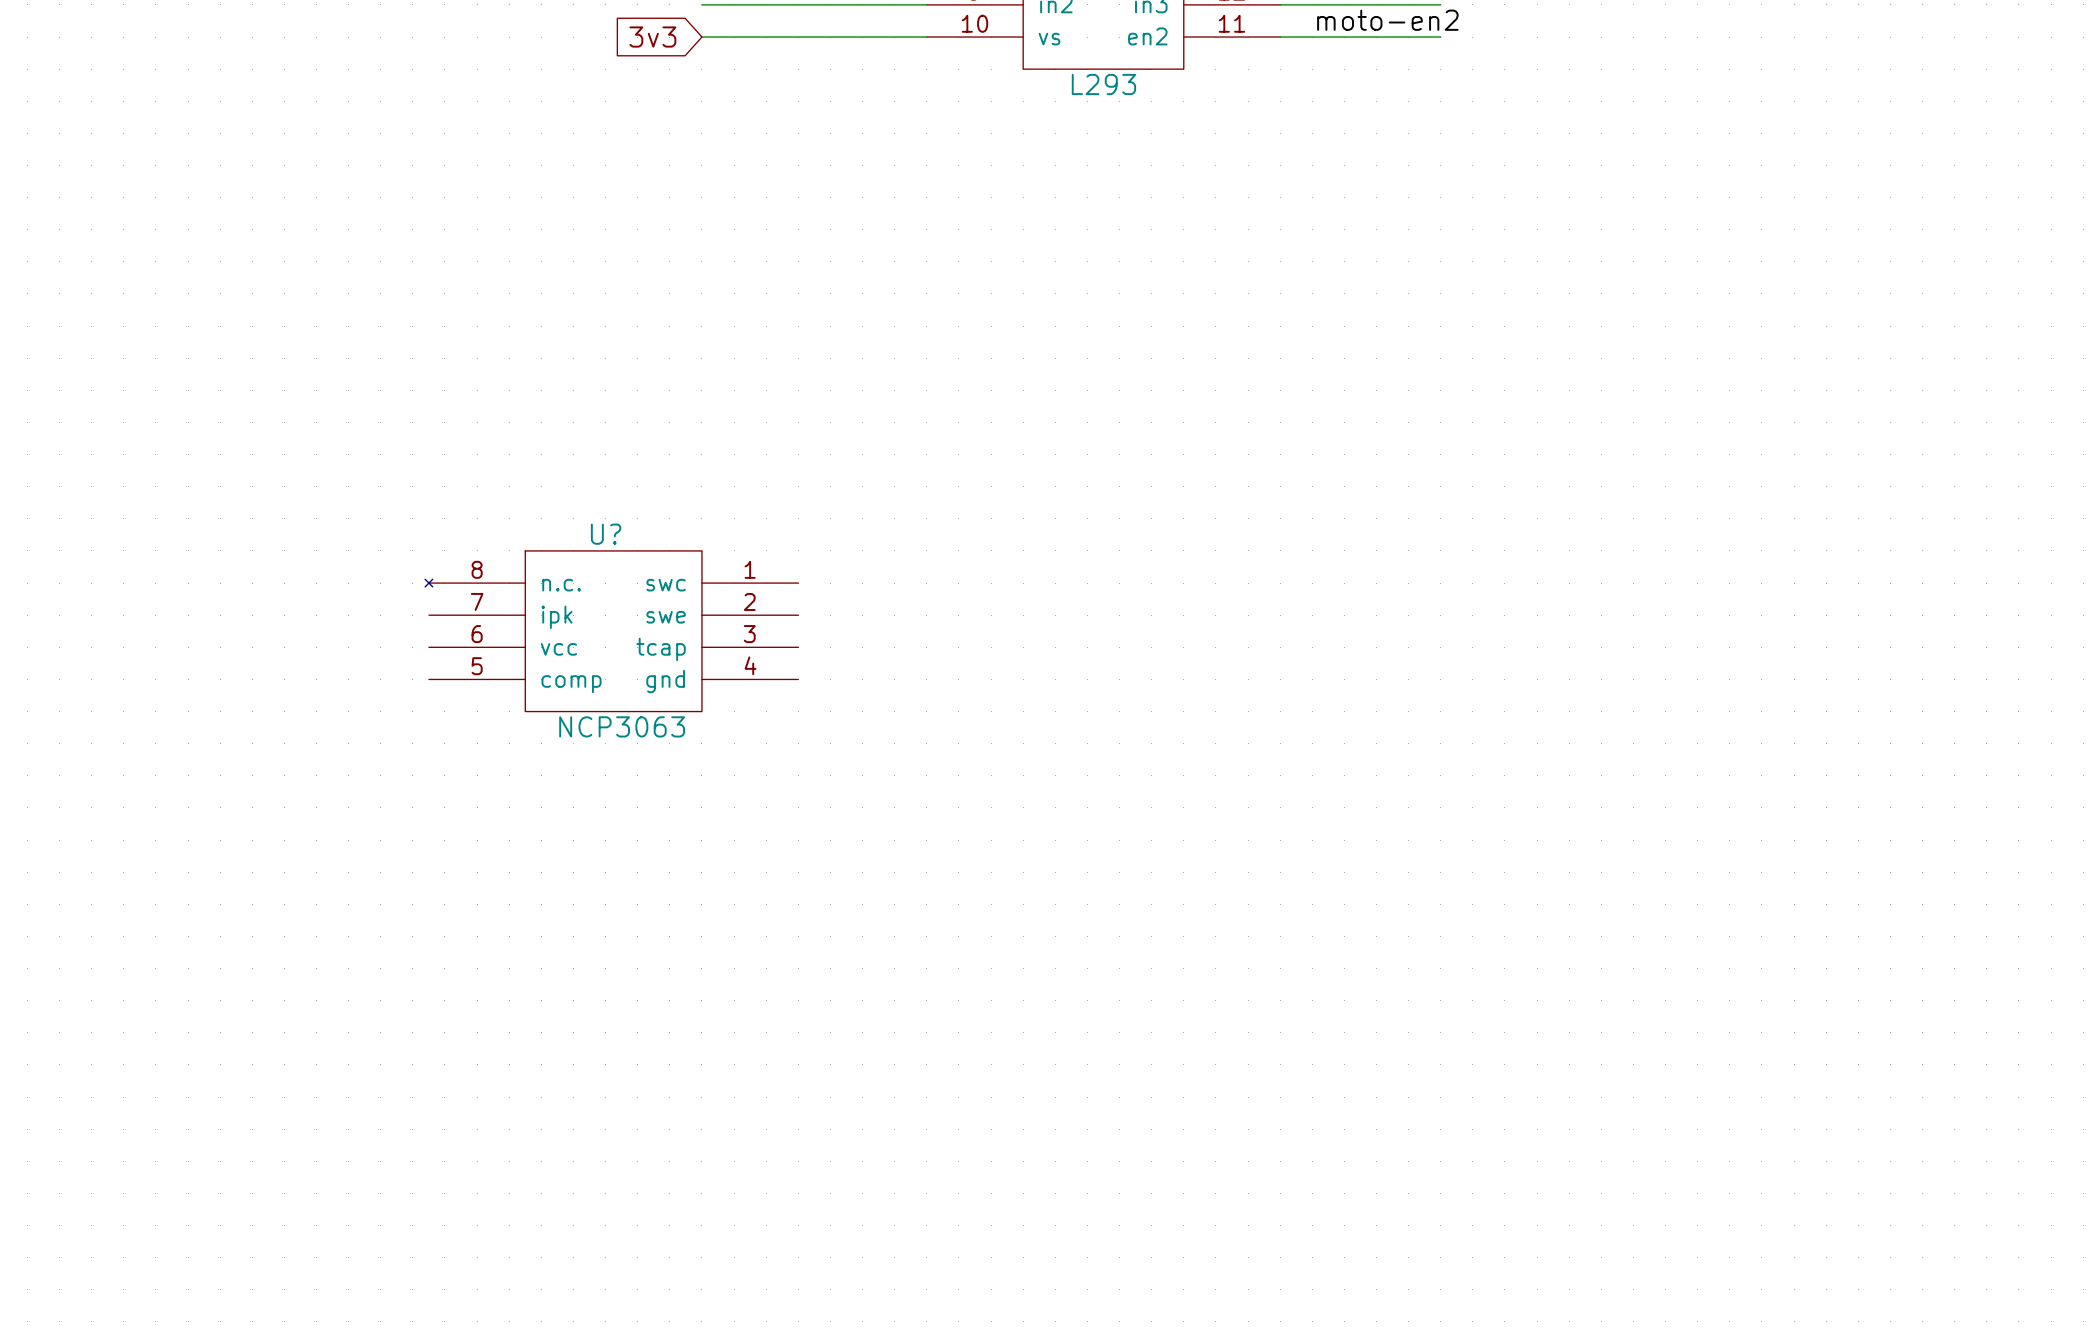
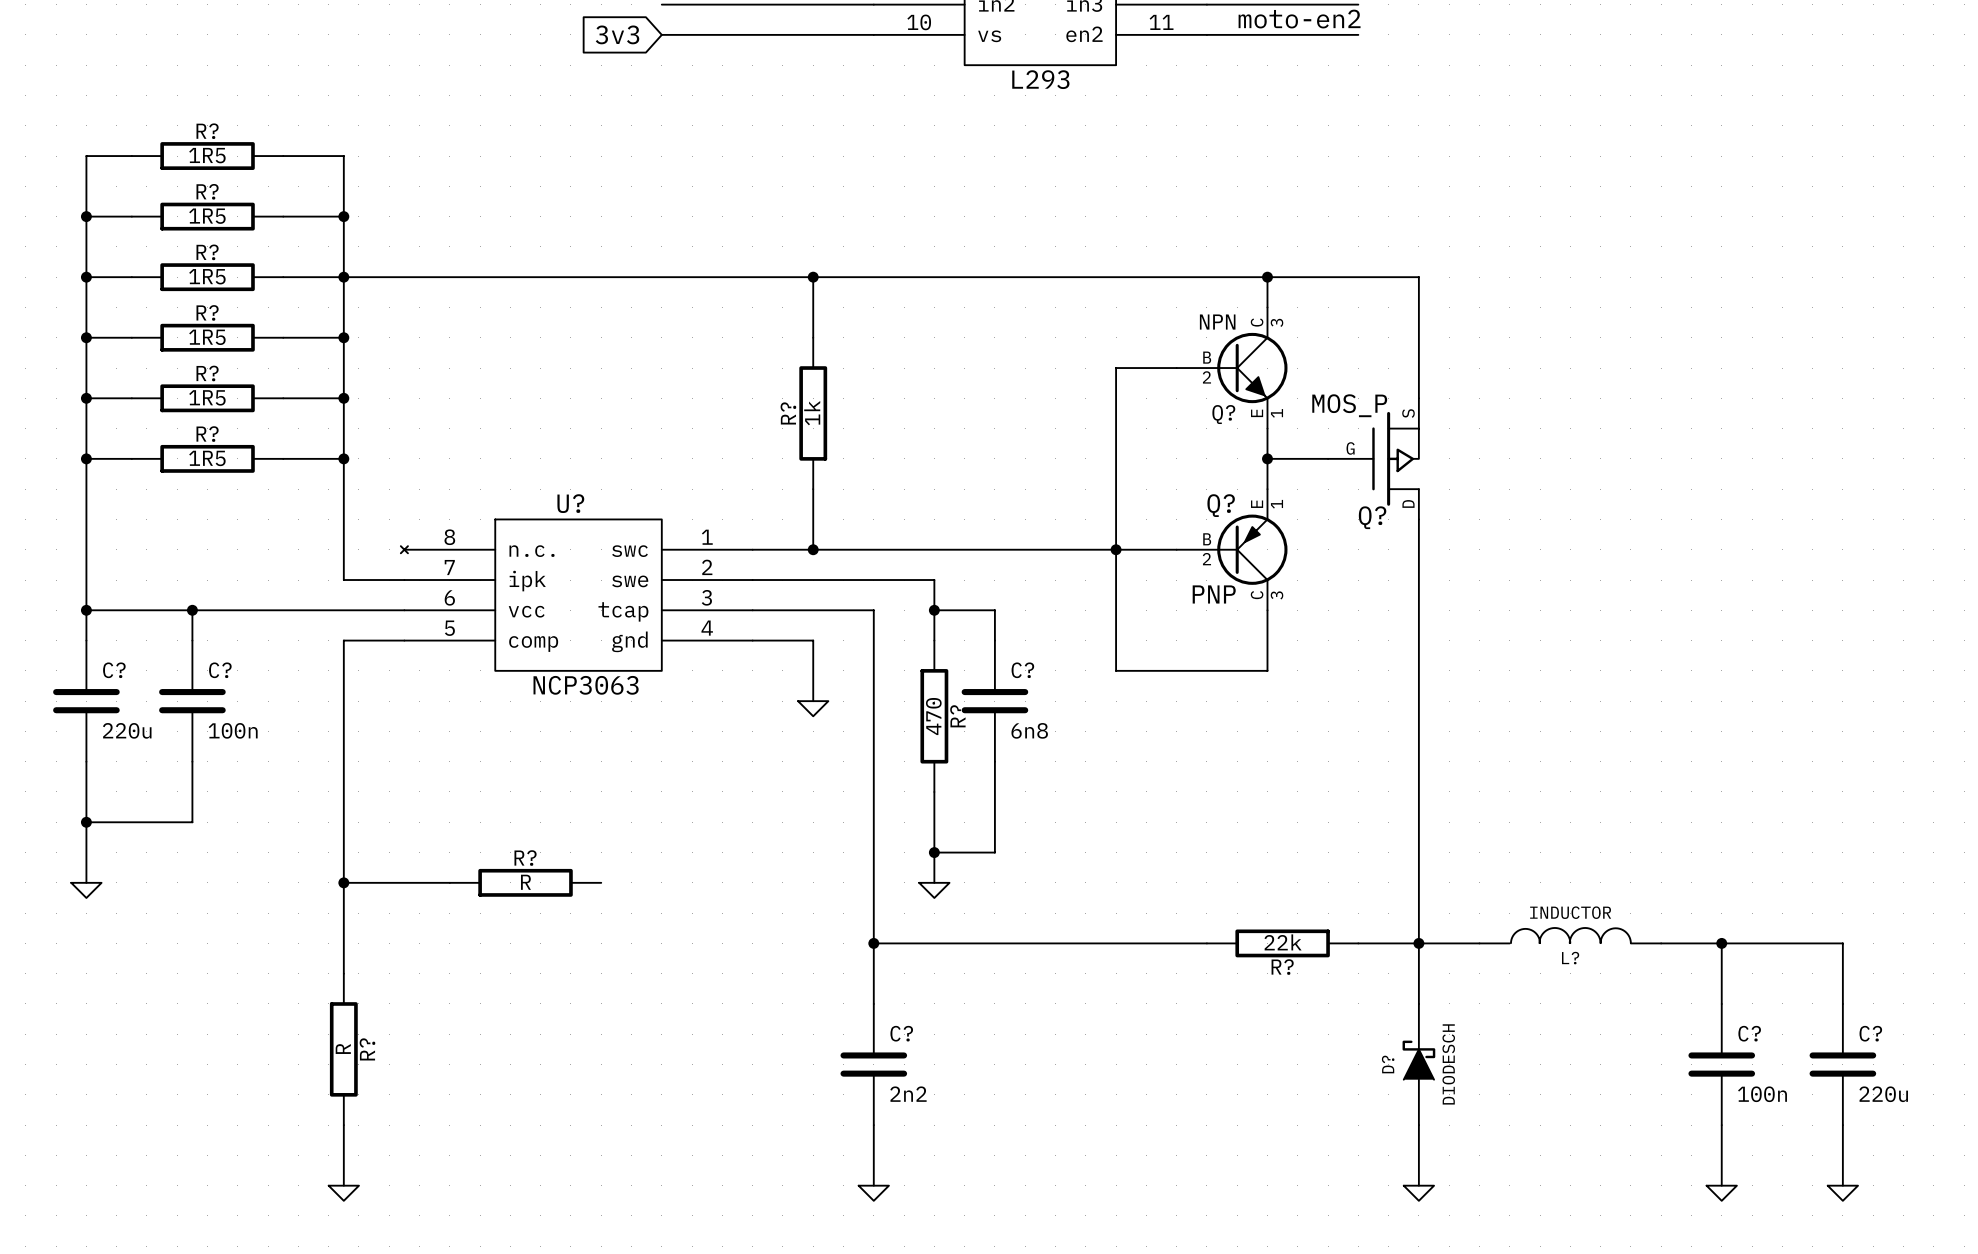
wire: none -> (131, 156) (86, 156) (86, 640)
R?: none -> 1R5 (207, 156)
wire: none -> (283, 156) (343, 156) (343, 580) (404, 580)
wire: none -> (86, 216) (131, 216)
junction: none -> (86, 216)
R?: none -> 1R5 (207, 216)
wire: none -> (283, 216) (343, 216)
junction: none -> (343, 216)
wire: none -> (86, 277) (131, 277)
junction: none -> (86, 277)
R?: none -> 1R5 (207, 277)
wire: none -> (283, 277) (1418, 277) (1418, 398)
junction: none -> (343, 277)
wire: none -> (813, 277) (813, 337)
junction: none -> (813, 277)
wire: none -> (1267, 277) (1267, 307)
junction: none -> (1267, 277)
wire: none -> (86, 337) (131, 337)
junction: none -> (86, 337)
R?: none -> 1R5 (207, 337)
wire: none -> (283, 337) (343, 337)
junction: none -> (343, 337)
wire: none -> (1176, 368) (1116, 368) (1116, 670) (1267, 670) (1267, 610)
Q?: none -> NPN (1232, 368)
wire: none -> (86, 398) (131, 398)
junction: none -> (86, 398)
R?: none -> 1R5 (207, 398)
wire: none -> (283, 398) (343, 398)
junction: none -> (343, 398)
R?: none -> 1k (813, 413)
wire: none -> (1267, 428) (1267, 489)
wire: none -> (86, 458) (131, 458)
junction: none -> (86, 458)
R?: none -> 1R5 (207, 458)
wire: none -> (283, 458) (343, 458)
junction: none -> (343, 458)
wire: none -> (1267, 458) (1328, 458)
junction: none -> (1267, 458)
Q?: none -> MOS_P (1373, 458)
wire: none -> (813, 489) (813, 549)
wire: none -> (1418, 519) (1418, 1003)
wire: none -> (752, 549) (1176, 549)
junction: none -> (813, 549)
junction: none -> (1116, 549)
Q?: none -> PNP (1232, 549)
wire: none -> (752, 580) (934, 580) (934, 640)
wire: none -> (86, 610) (404, 610)
junction: none -> (86, 610)
wire: none -> (192, 610) (192, 640)
junction: none -> (192, 610)
wire: none -> (752, 610) (873, 610) (873, 1003)
wire: none -> (934, 610) (994, 610) (994, 640)
junction: none -> (934, 610)
wire: none -> (404, 640) (343, 640) (343, 973)
wire: none -> (752, 640) (813, 640) (813, 701)
C?: none -> 220u (86, 701)
C?: none -> 100n (192, 701)
C?: none -> 6n8 (994, 701)
power symbol: none -> (813, 708)
R?: none -> 470 (934, 716)
wire: none -> (86, 761) (86, 882)
wire: none -> (192, 761) (192, 822) (86, 822)
wire: none -> (994, 761) (994, 852) (934, 852)
wire: none -> (934, 791) (934, 882)
junction: none -> (86, 822)
junction: none -> (934, 852)
wire: none -> (343, 882) (449, 882)
junction: none -> (343, 882)
R?: none -> R (525, 882)
power symbol: none -> (86, 890)
power symbol: none -> (934, 890)
L?: none -> INDUCTOR (1570, 935)
wire: none -> (873, 943) (1206, 943)
junction: none -> (873, 943)
R?: none -> 22k (1282, 943)
wire: none -> (1358, 943) (1479, 943)
junction: none -> (1418, 943)
wire: none -> (1661, 943) (1842, 943) (1842, 1003)
wire: none -> (1721, 943) (1721, 1003)
junction: none -> (1721, 943)
R?: none -> R (343, 1049)
C?: none -> 2n2 (873, 1064)
D?: none -> DIODESCH (1418, 1064)
C?: none -> 100n (1721, 1064)
C?: none -> 220u (1842, 1064)
wire: none -> (343, 1125) (343, 1185)
wire: none -> (873, 1125) (873, 1185)
wire: none -> (1418, 1125) (1418, 1185)
wire: none -> (1721, 1125) (1721, 1185)
wire: none -> (1842, 1125) (1842, 1185)
power symbol: none -> (343, 1193)
power symbol: none -> (873, 1193)
power symbol: none -> (1418, 1193)
power symbol: none -> (1721, 1193)
power symbol: none -> (1842, 1193)

